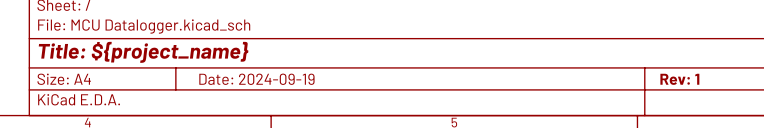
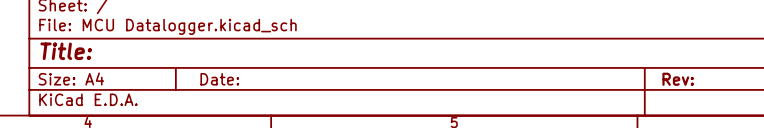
title block: Title: ${project_name} (143, 52) -> Title: (66, 51)
title block: Date: 2024-09-19 (256, 79) -> Date: (219, 79)
title block: Rev: 1 (679, 79) -> Rev: (678, 79)

